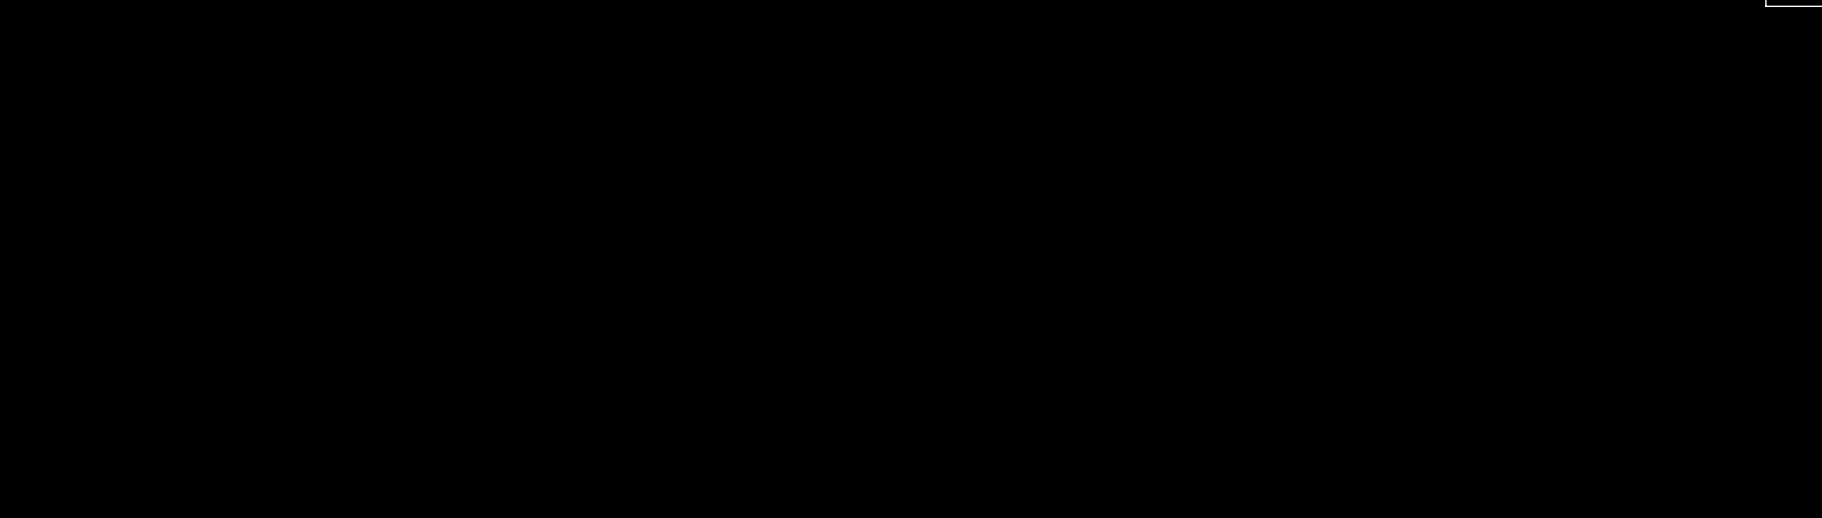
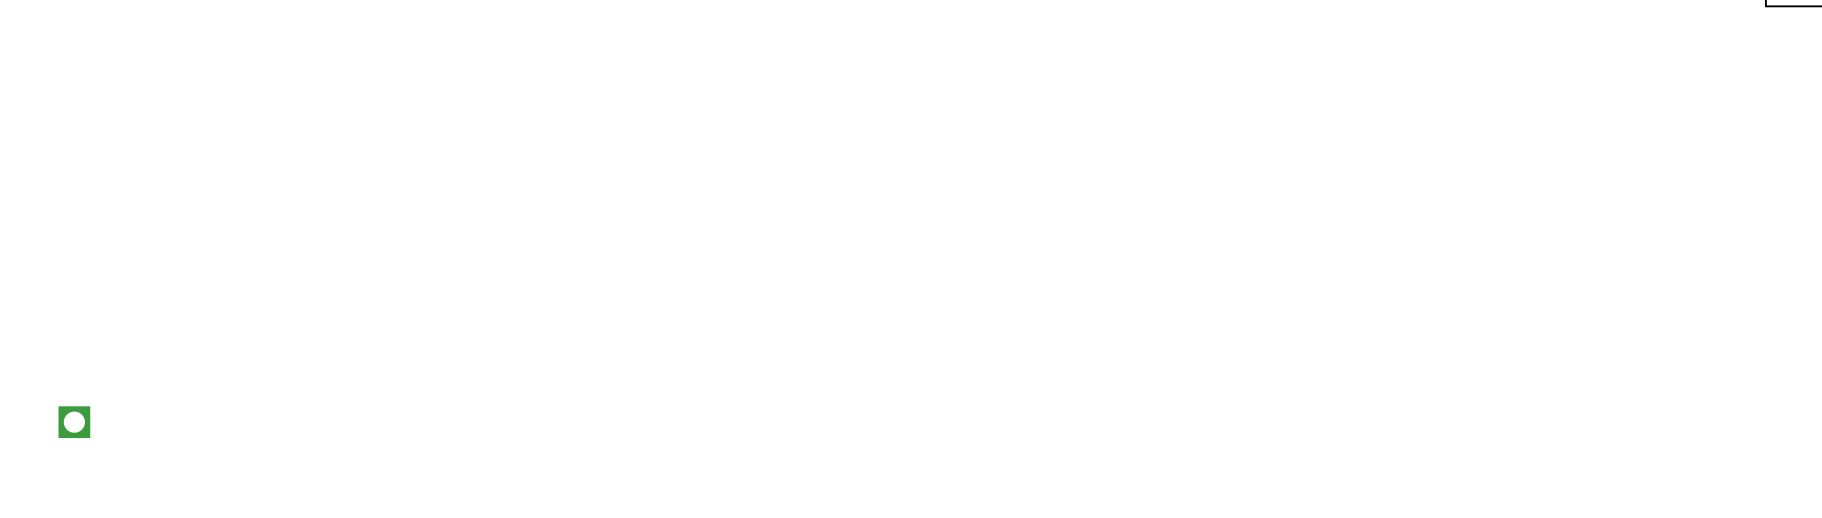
part: none -> (74, 422)

